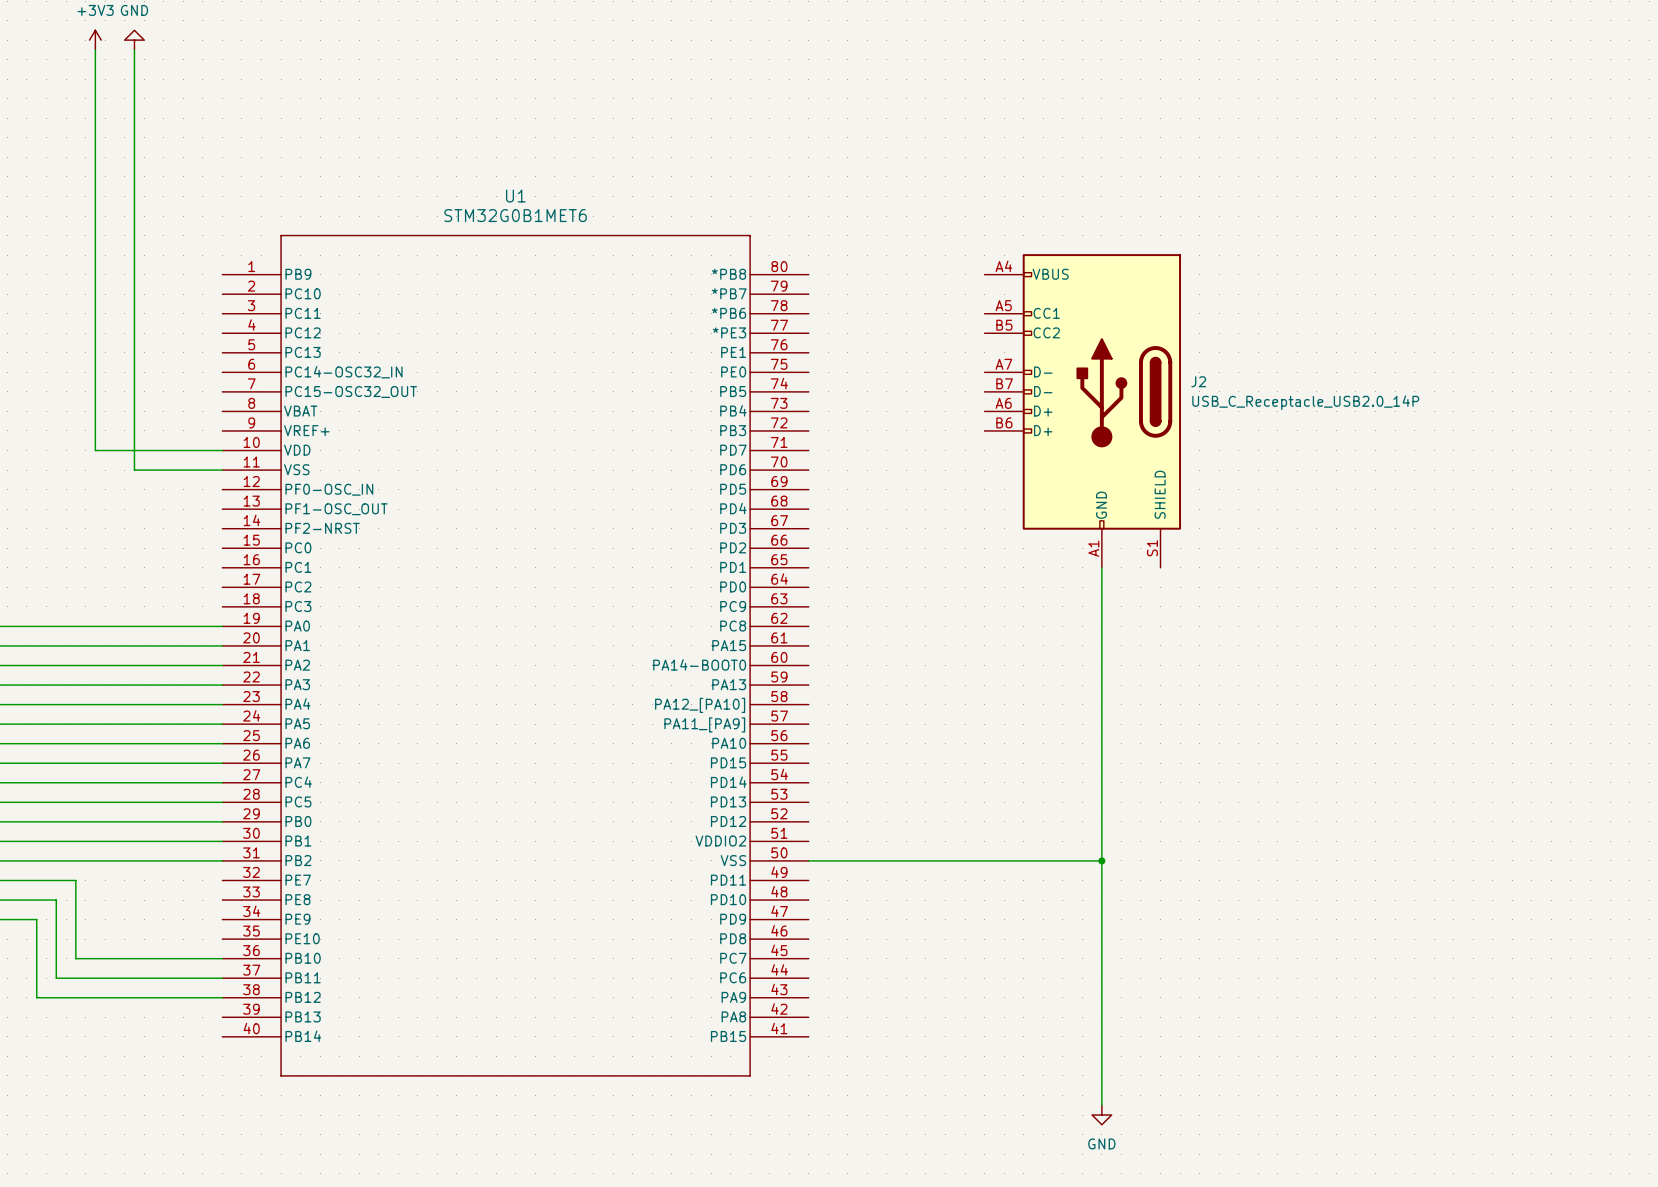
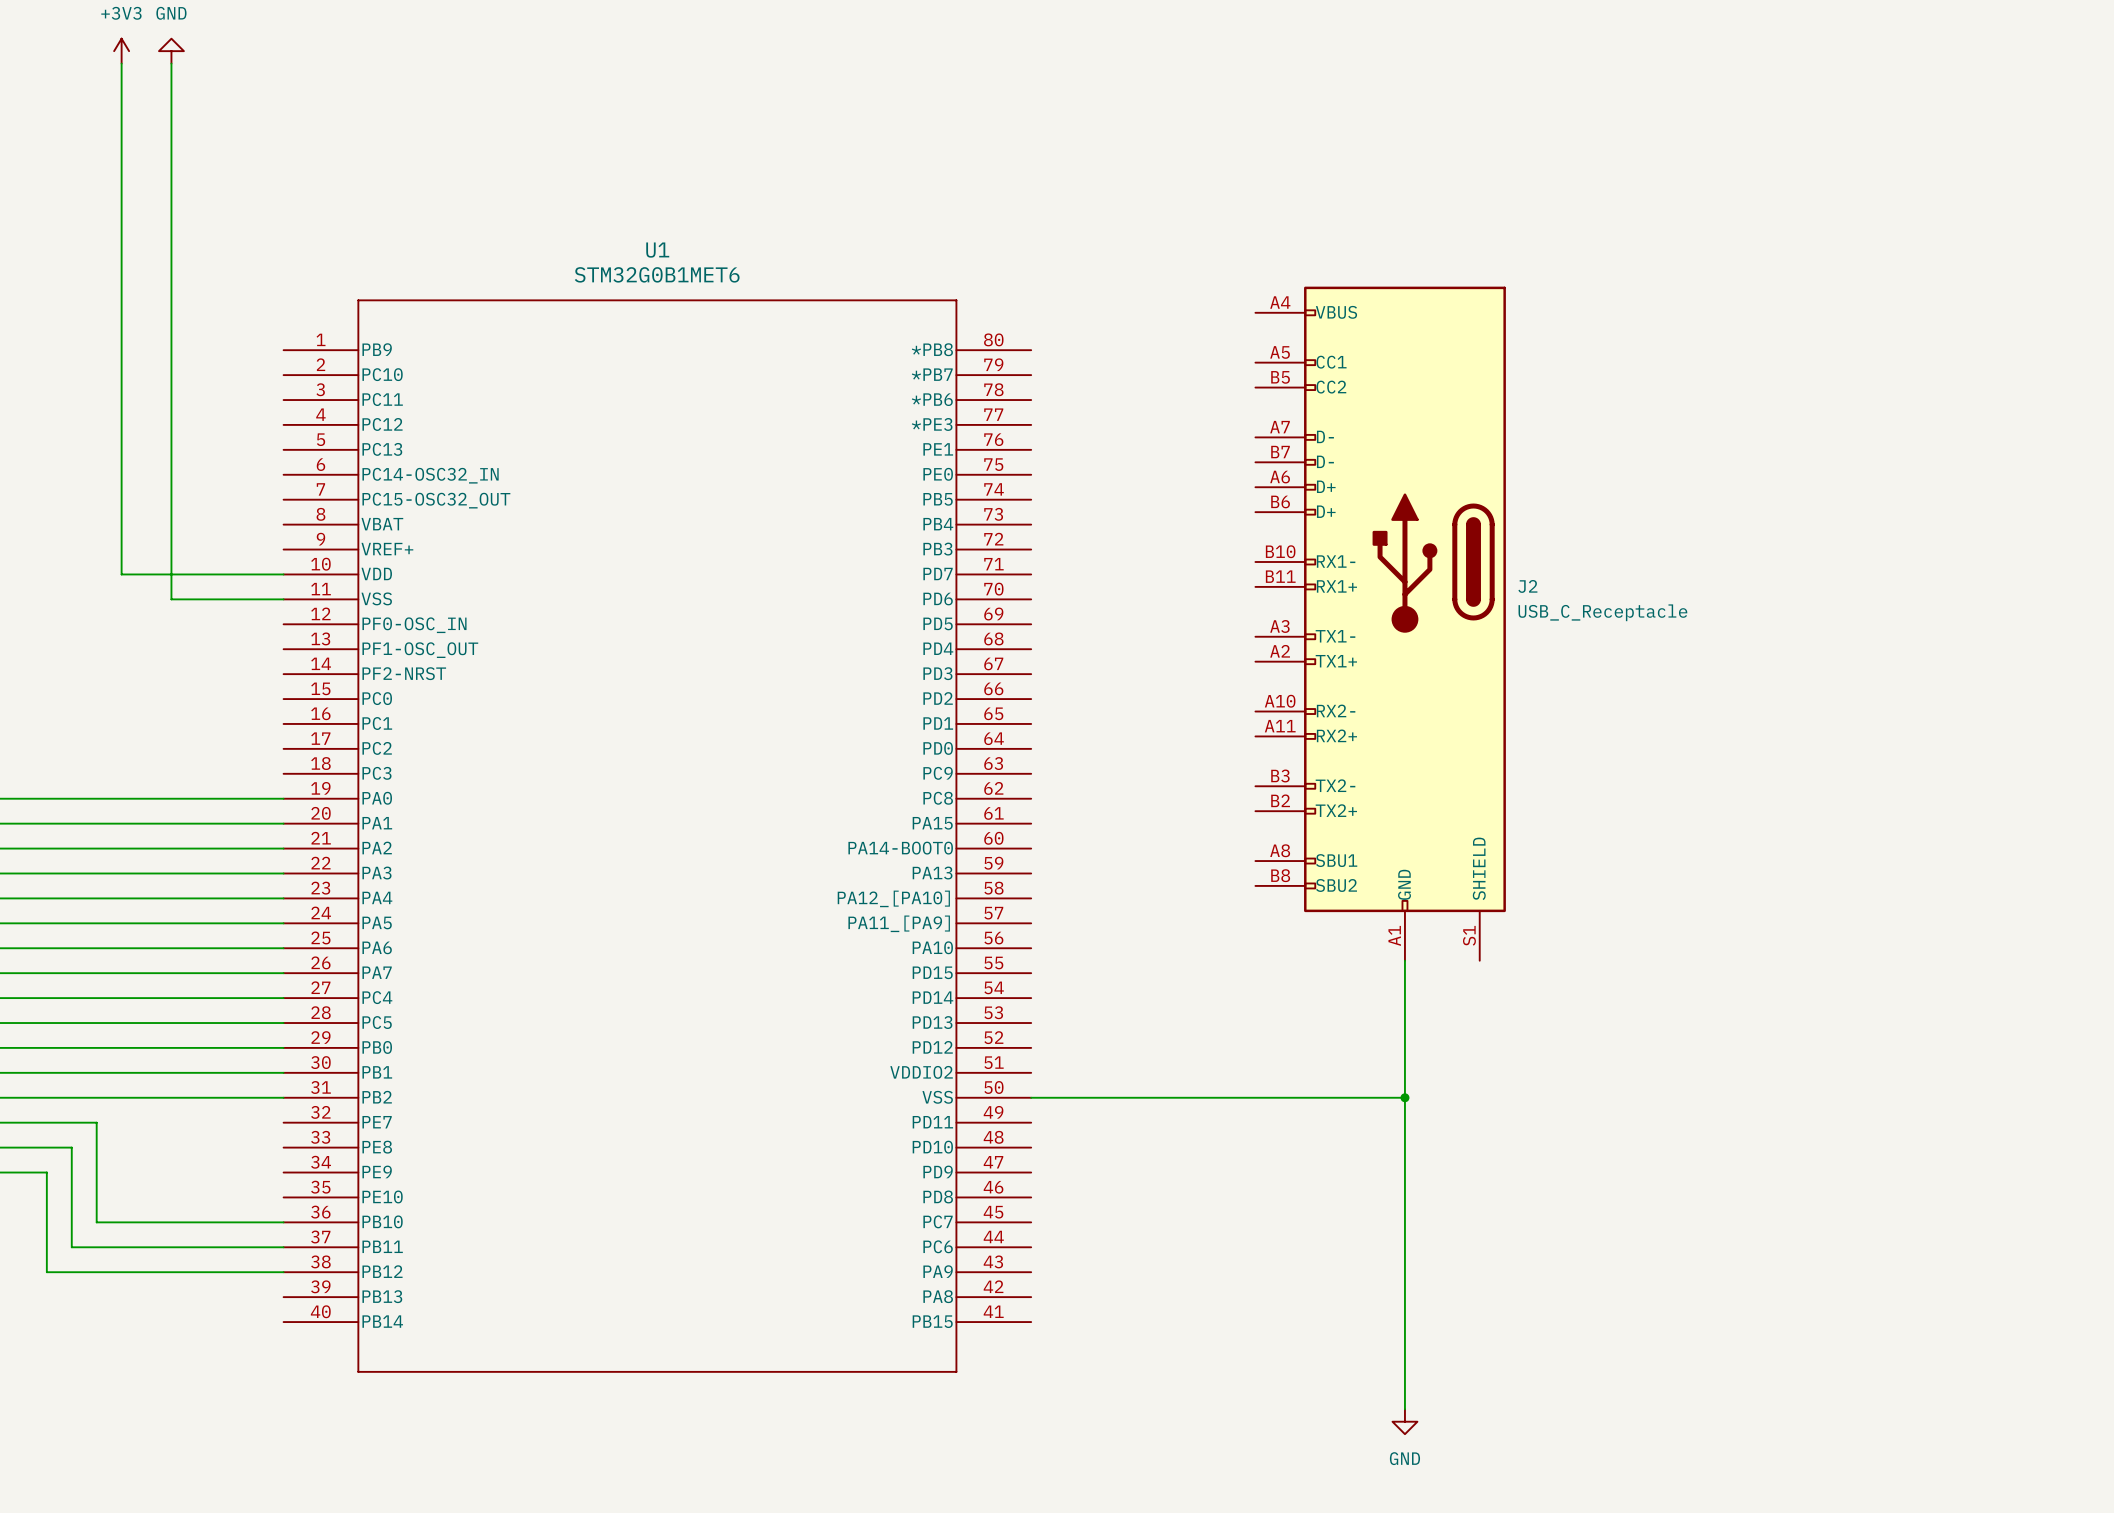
J2 symbol: [984, 254, 1182, 568] -> [1255, 286, 1506, 961]
J2 value: USB_C_Receptacle_USB2.0_14P (1305, 402) -> USB_C_Receptacle (1602, 612)

